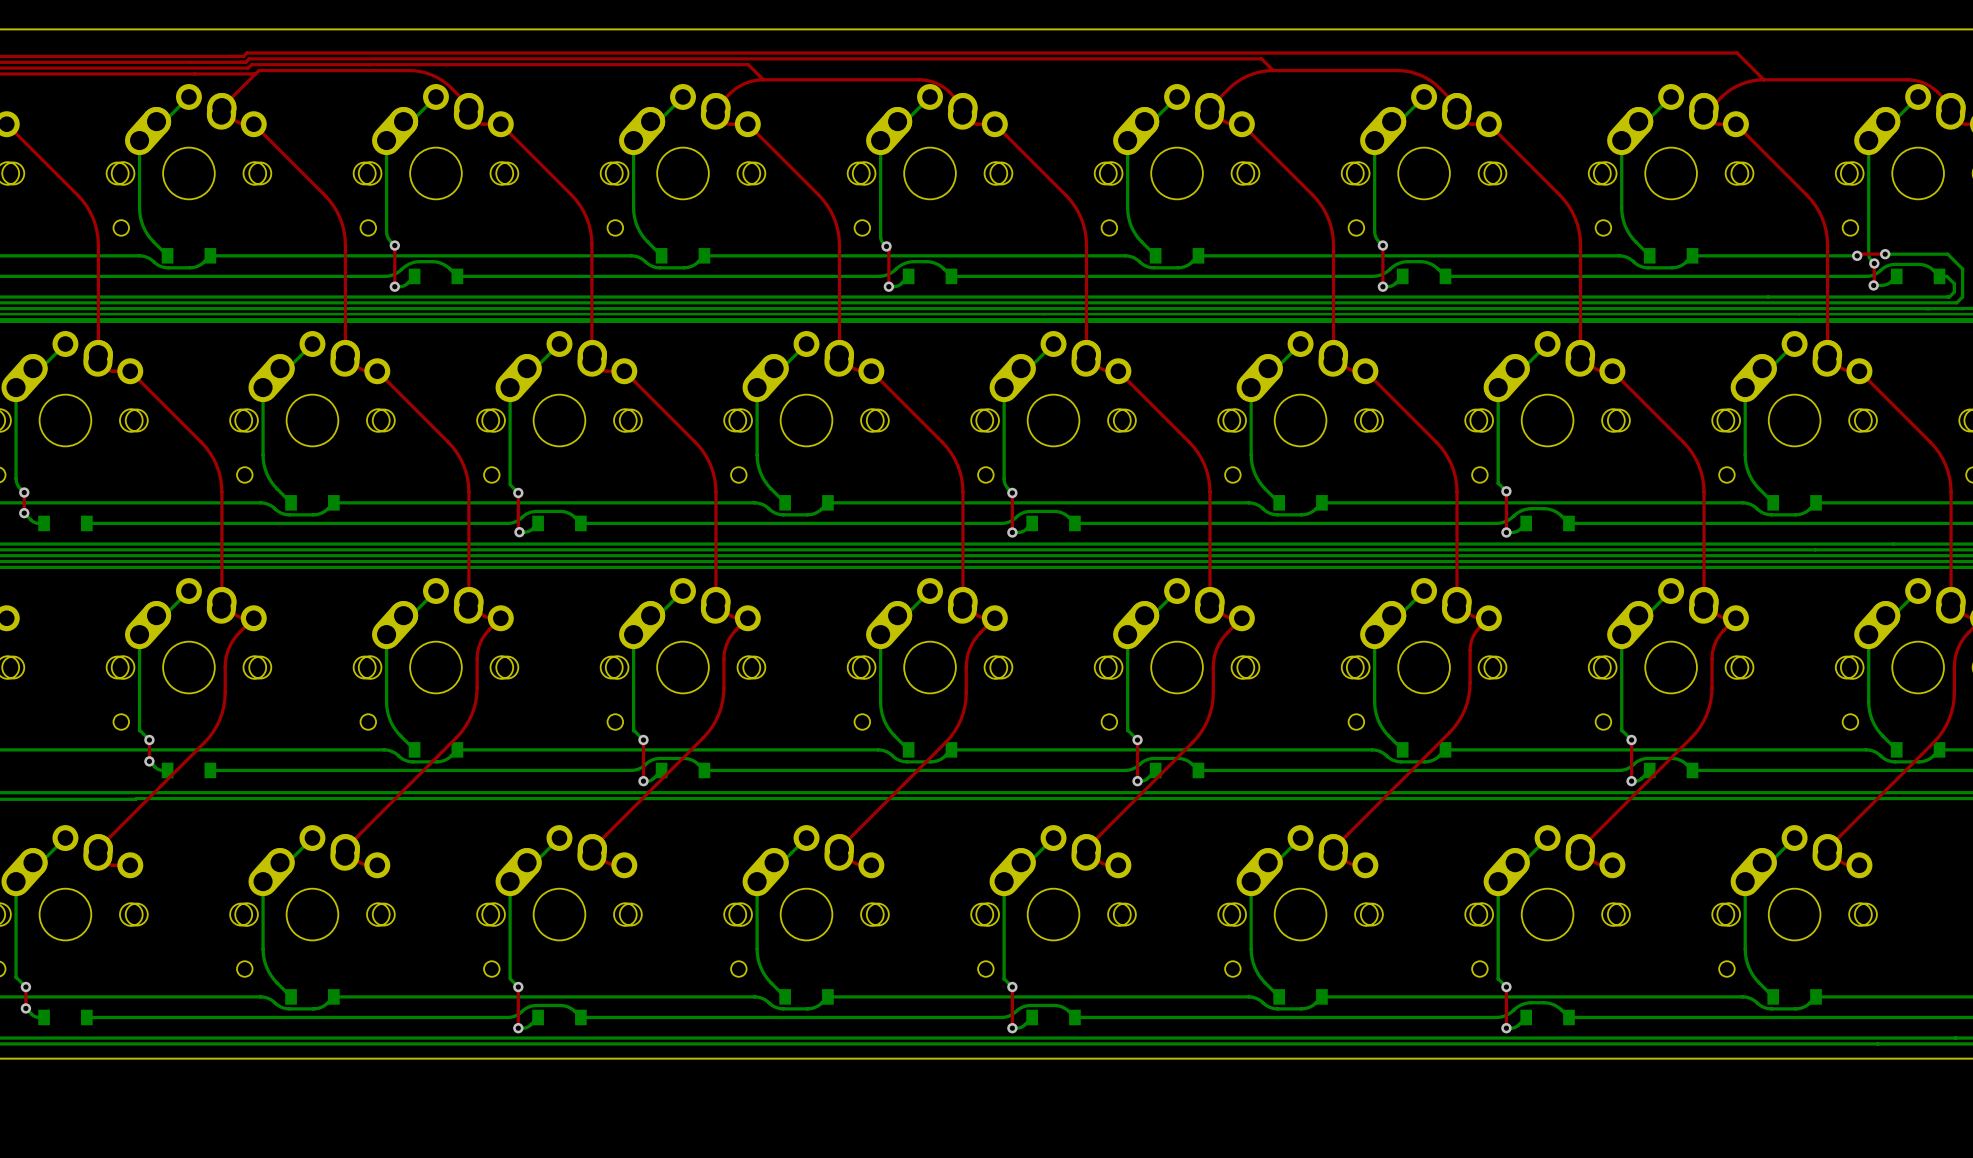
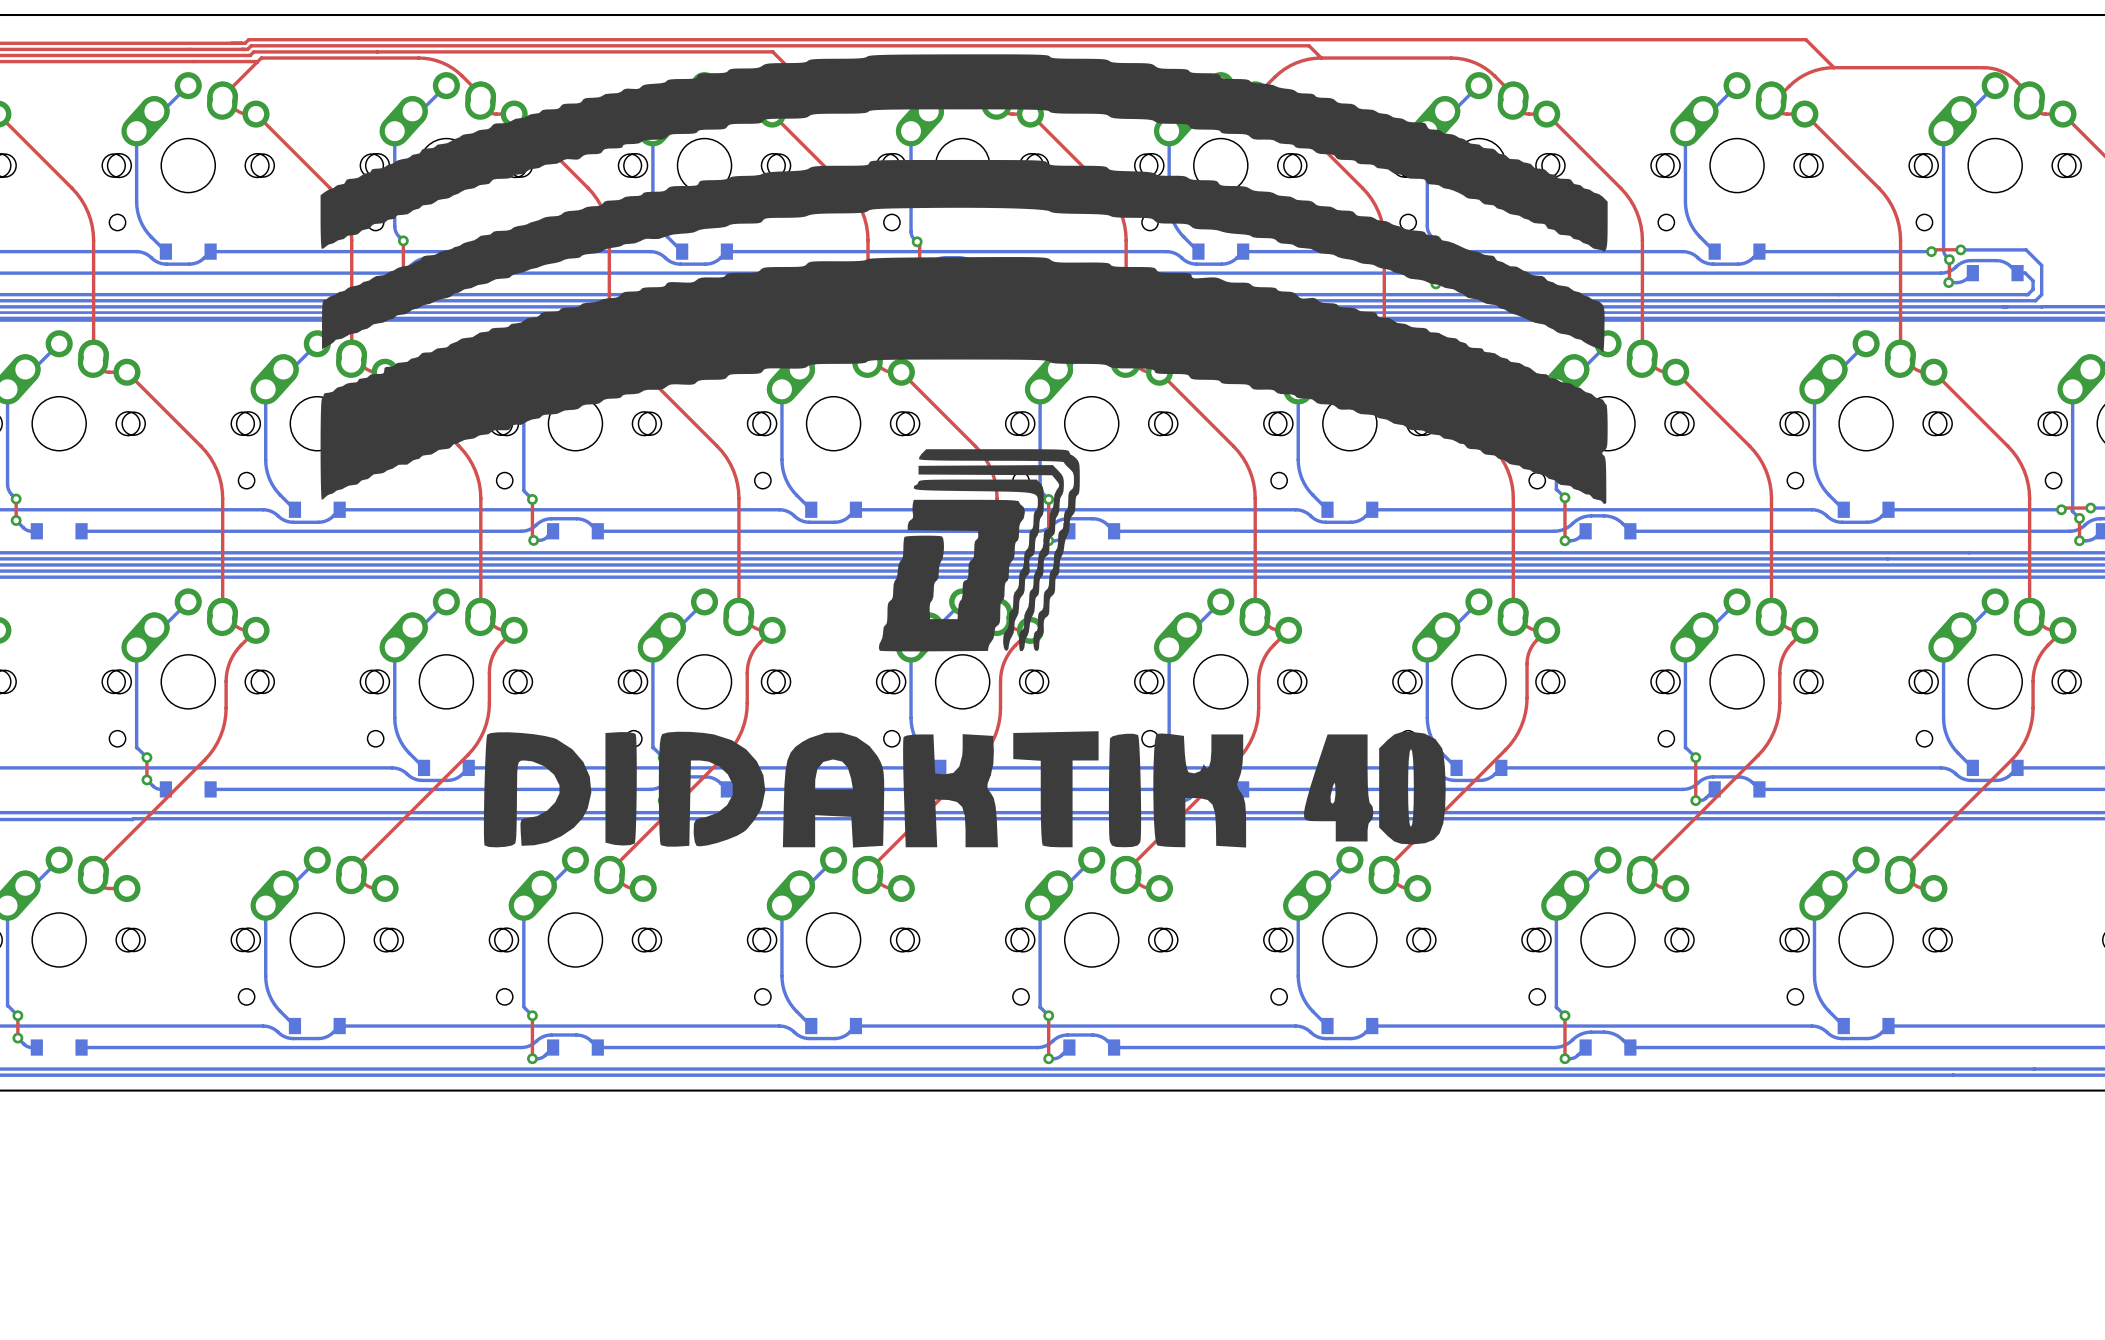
drawing: none -> [320, 54, 1608, 652]
drawing: none -> [483, 731, 1446, 848]

